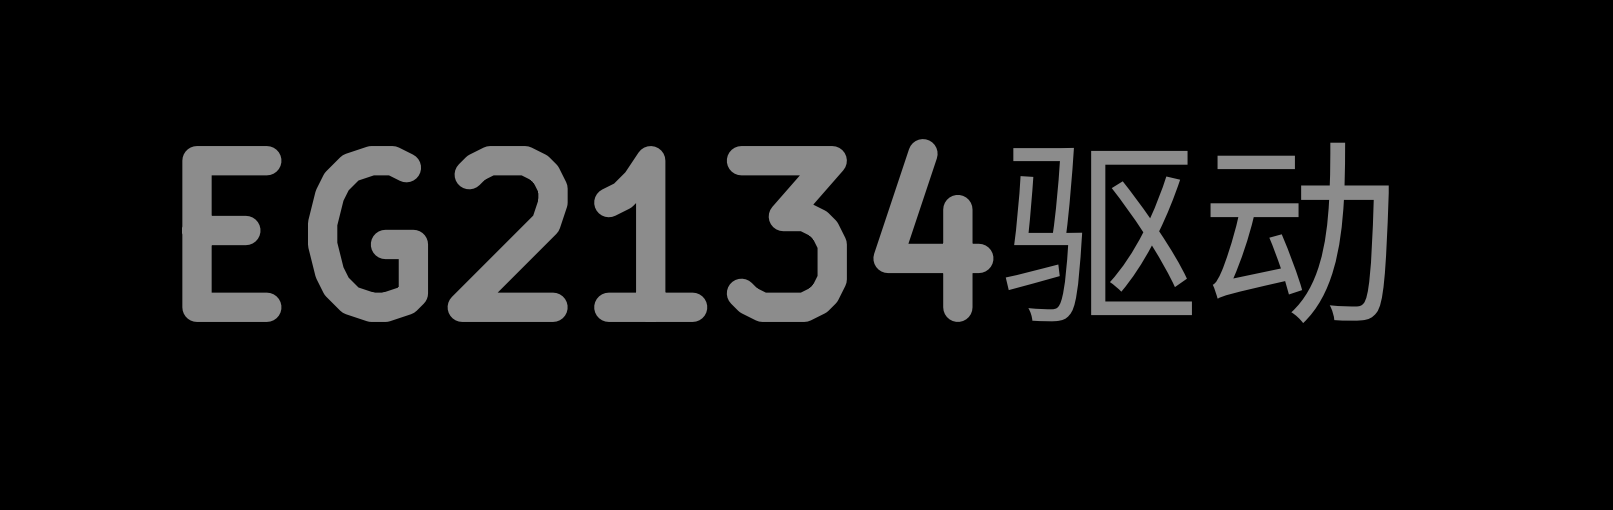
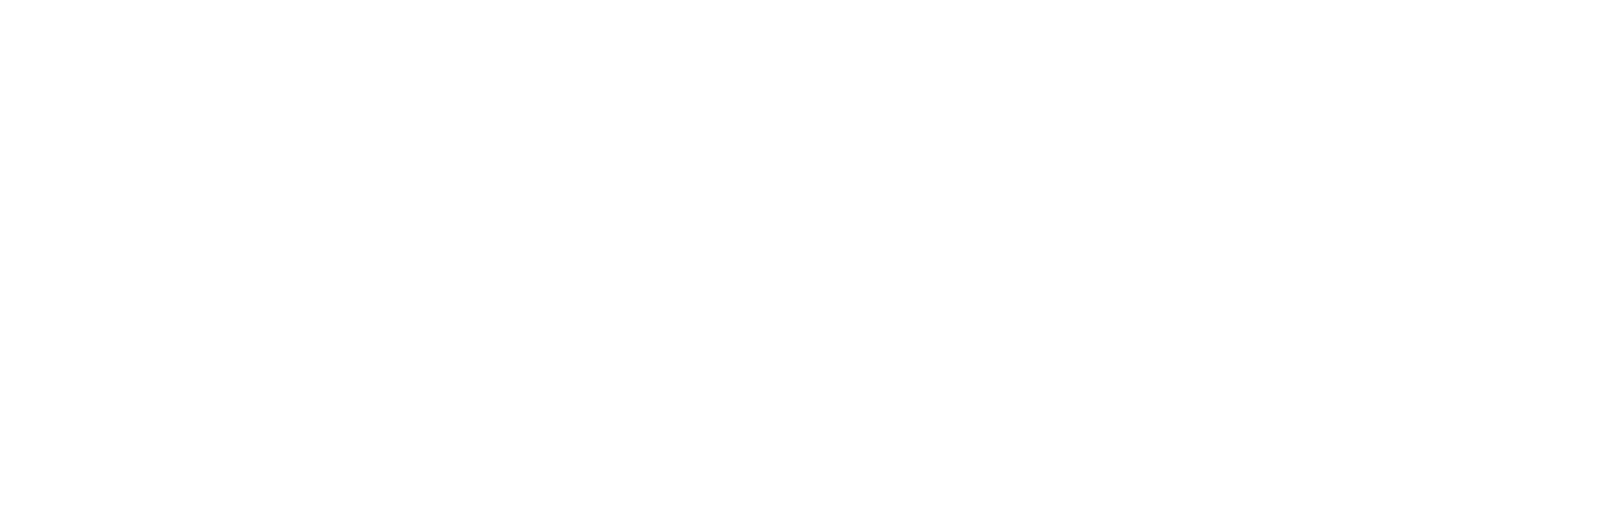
text: EG2134驱动 (792, 232) -> none

